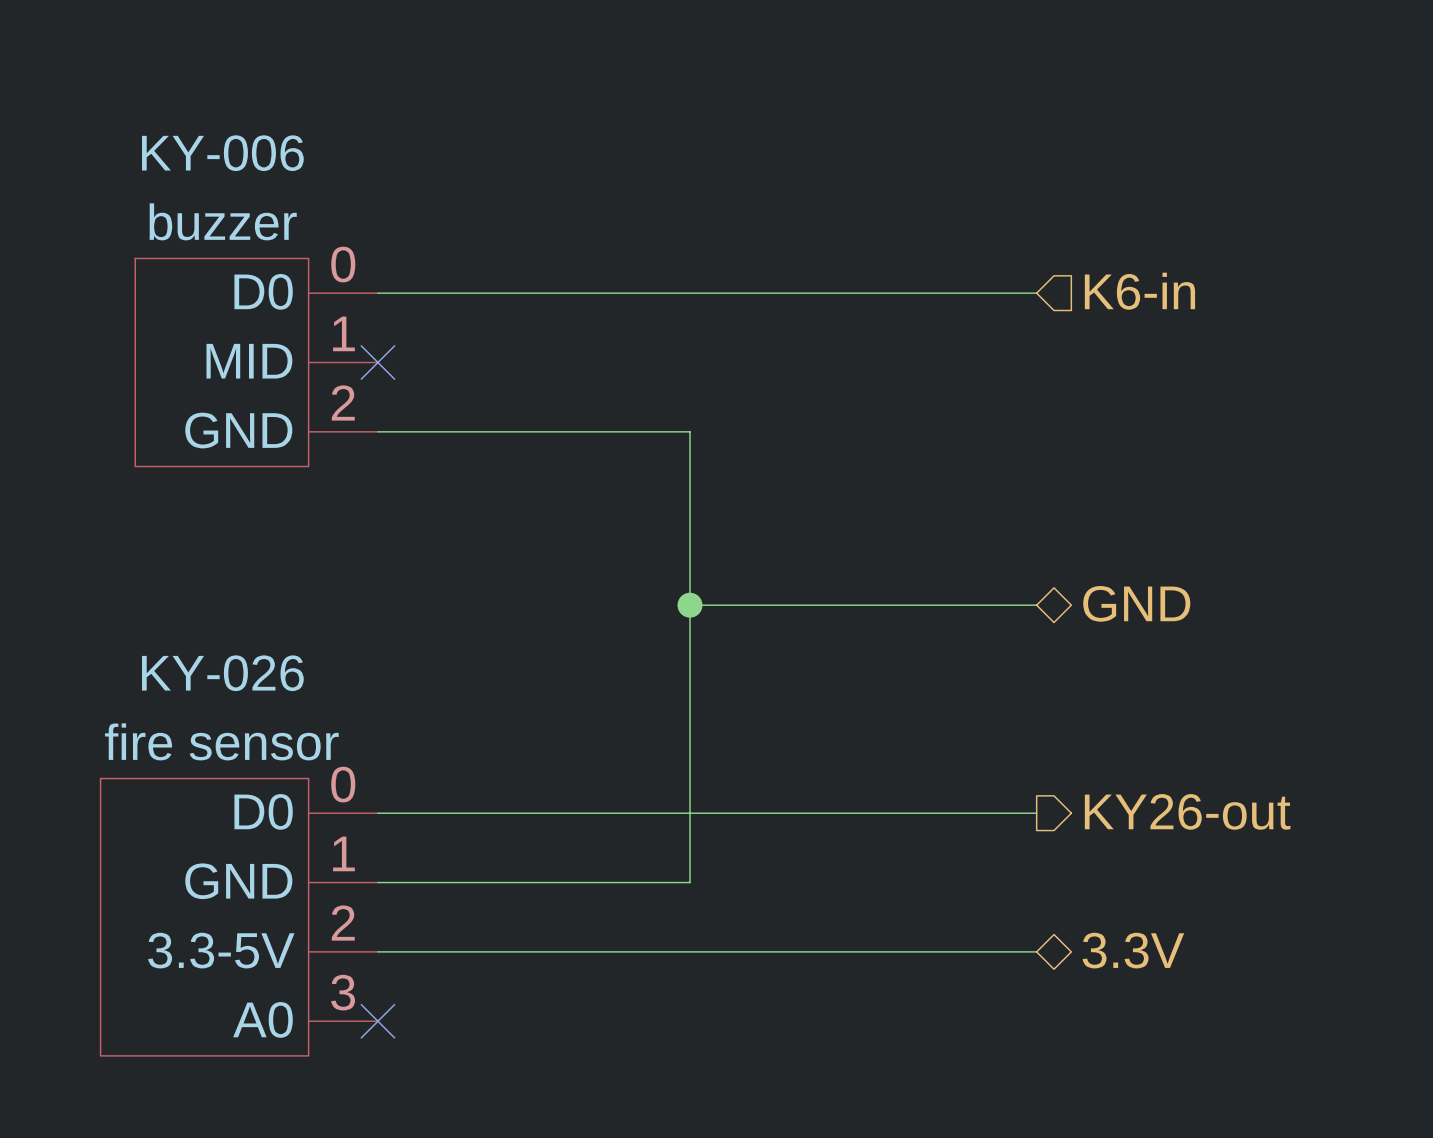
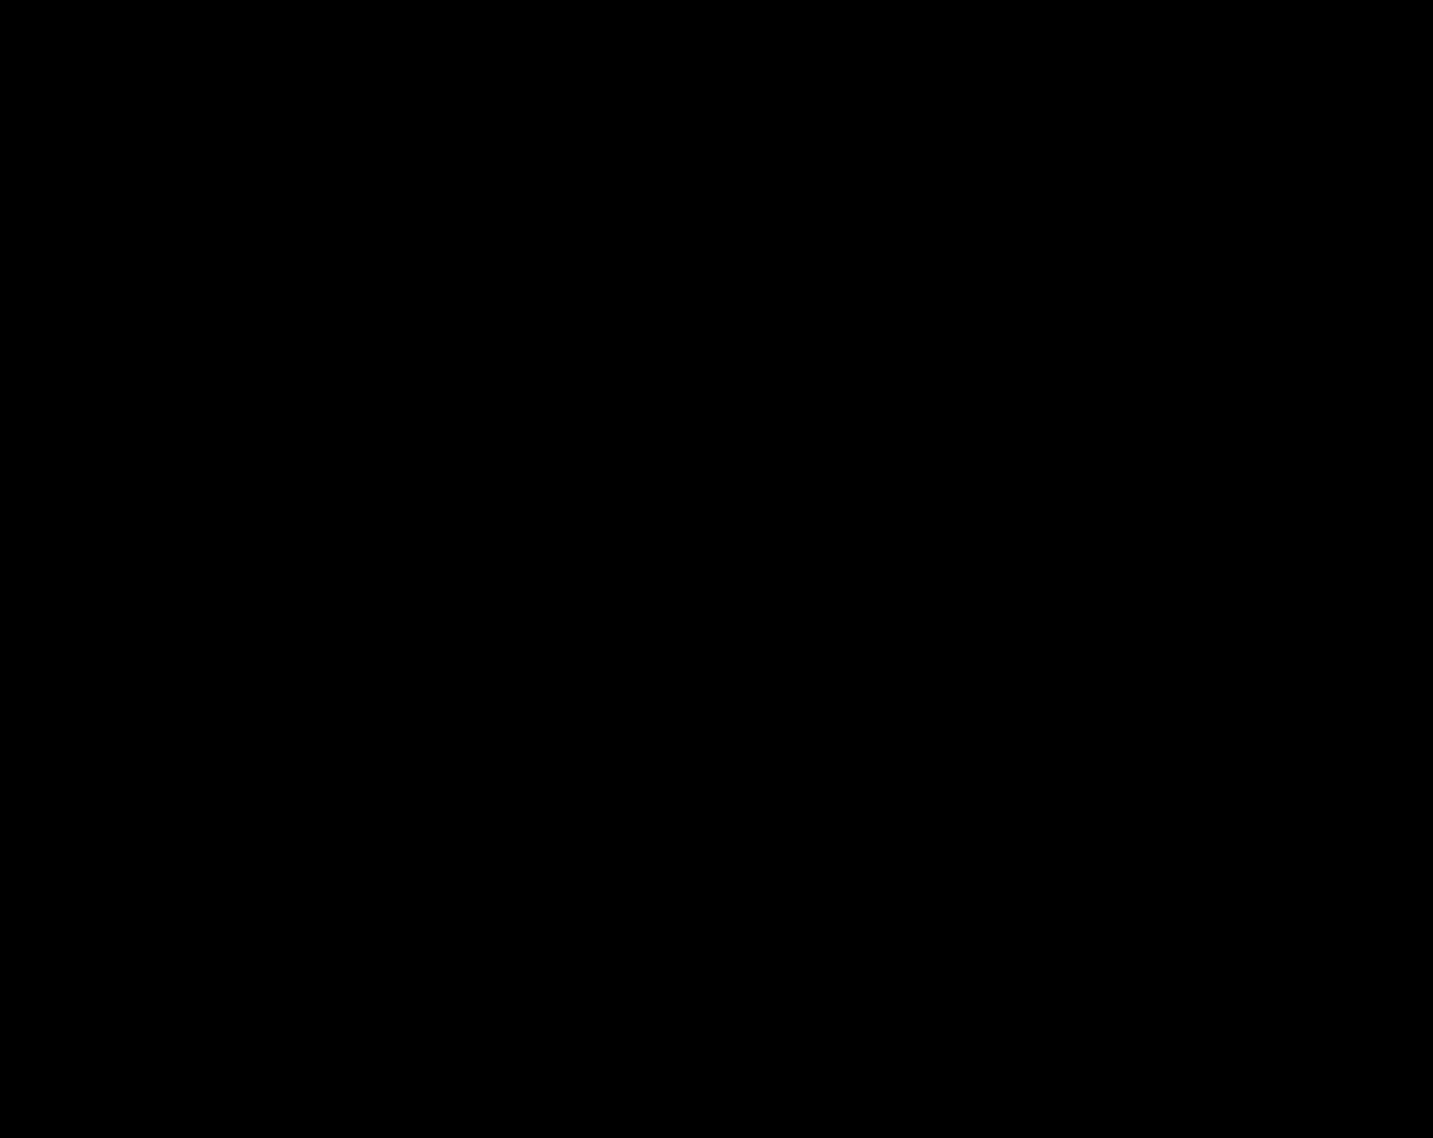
hierarchical label: K6-in (1139, 291) -> none
wire: (377, 293) (1036, 293) -> none
KY-006: buzzer (256, 362) -> none
no-connect mark: (377, 362) -> none
wire: (377, 431) (689, 431) (689, 882) (377, 882) -> none
hierarchical label: GND (1136, 603) -> none
wire: (689, 605) (1036, 605) -> none
junction: (689, 605) -> none
hierarchical label: KY26-out (1187, 811) -> none
wire: (377, 813) (1036, 813) -> none
KY-026: fire sensor (239, 917) -> none
hierarchical label: 3.3V (1133, 950) -> none
wire: (377, 951) (1036, 951) -> none
no-connect mark: (377, 1021) -> none

